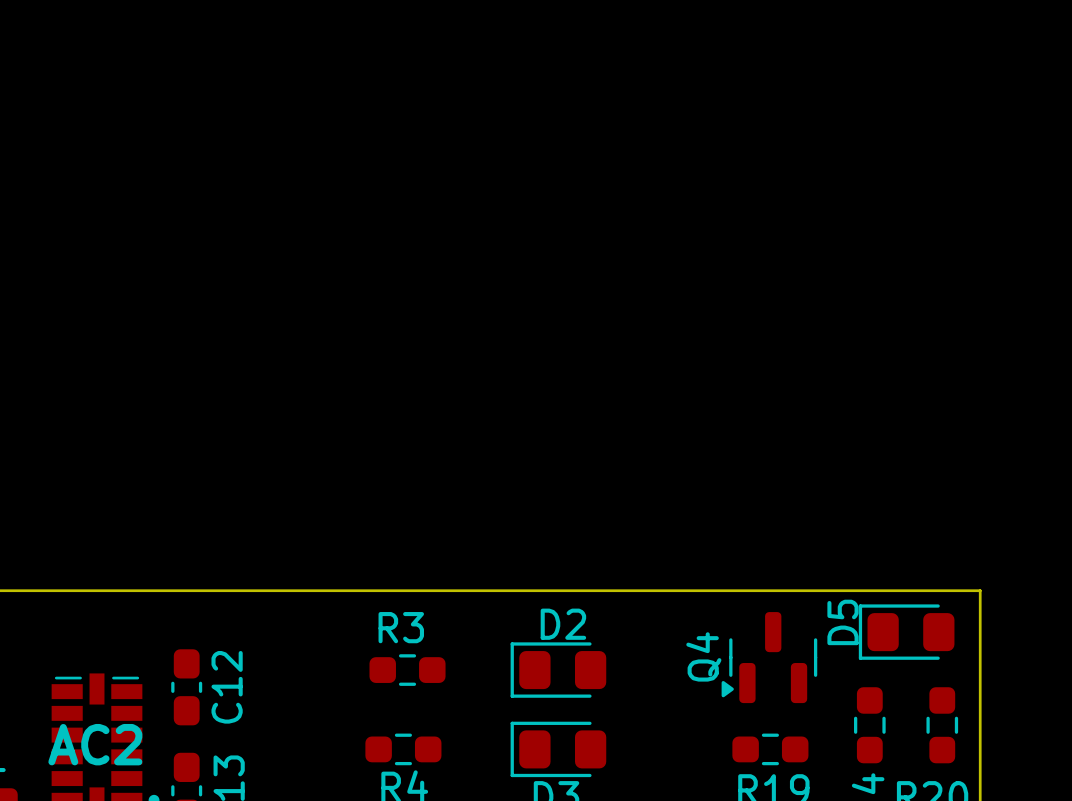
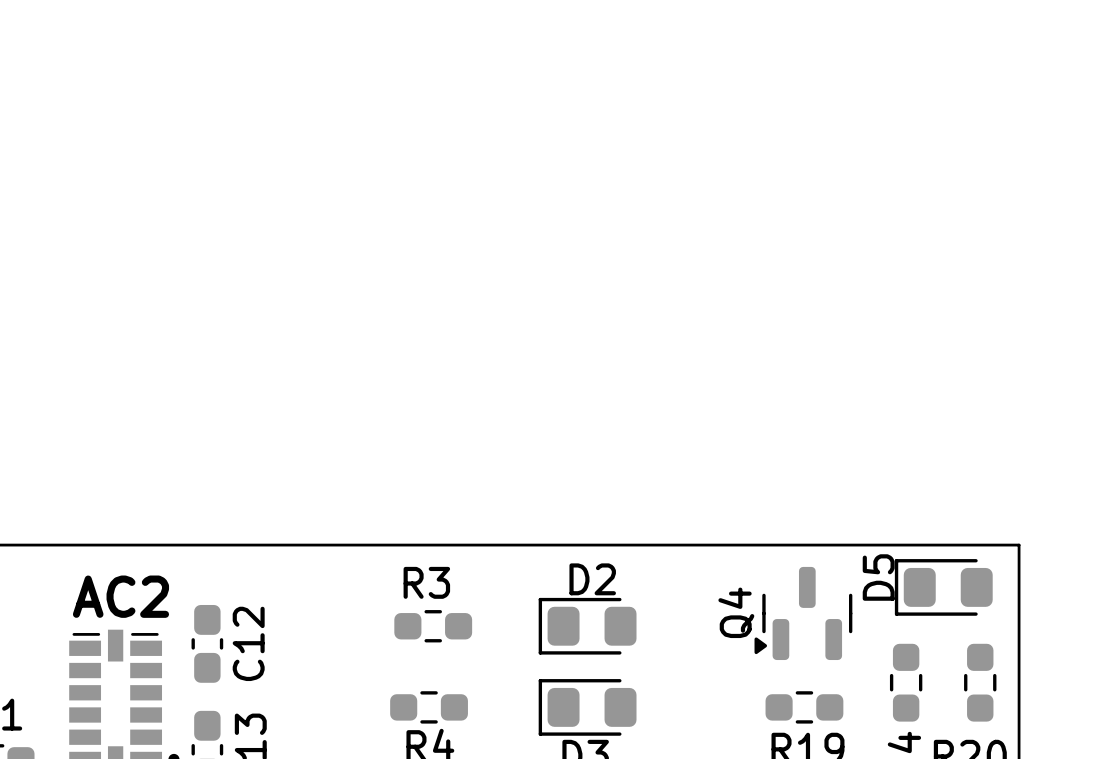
AC2 name position: AC2 (95, 744) -> AC2 (120, 596)

